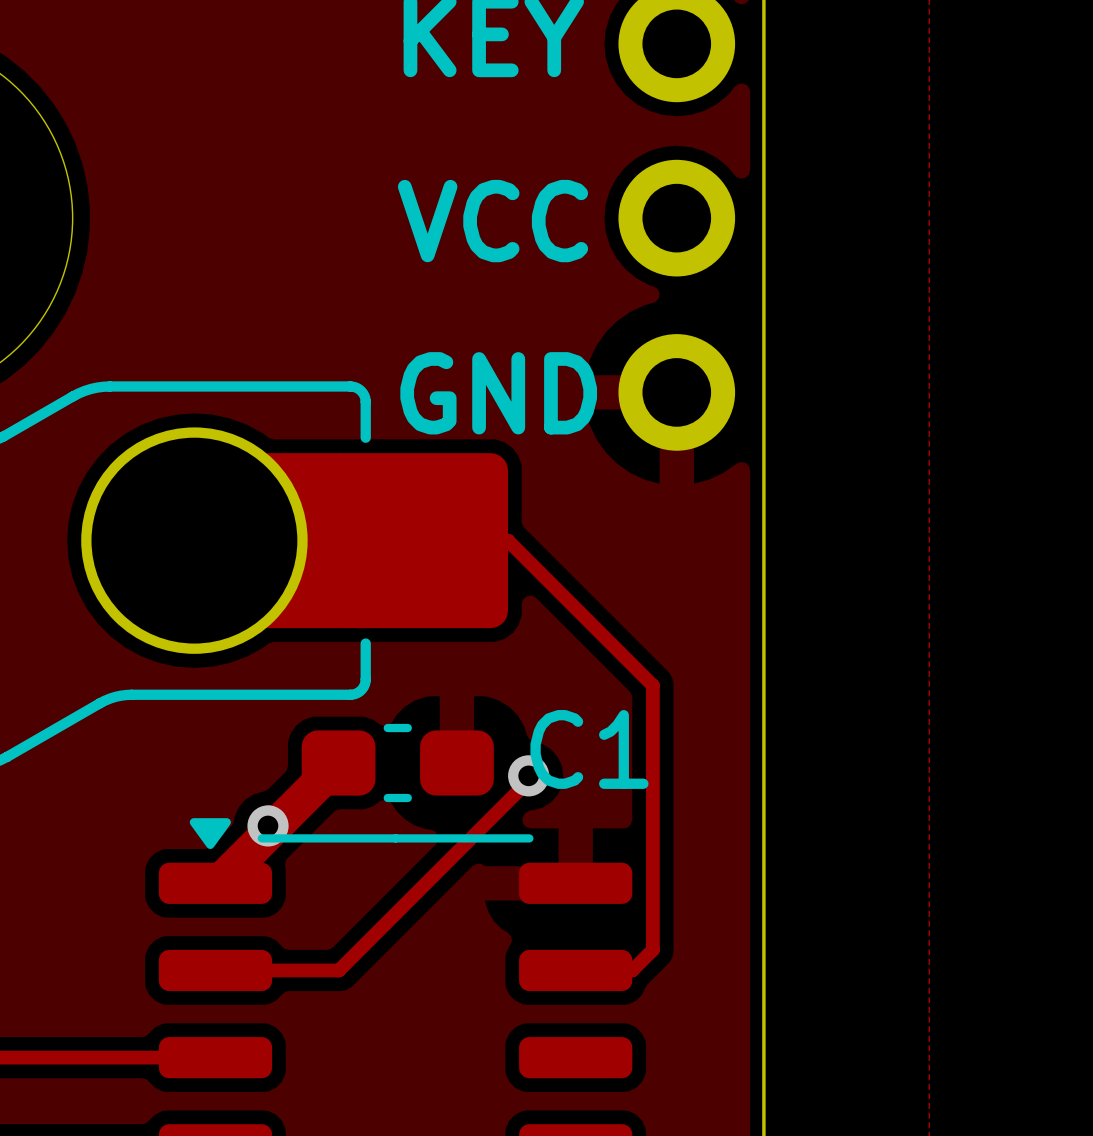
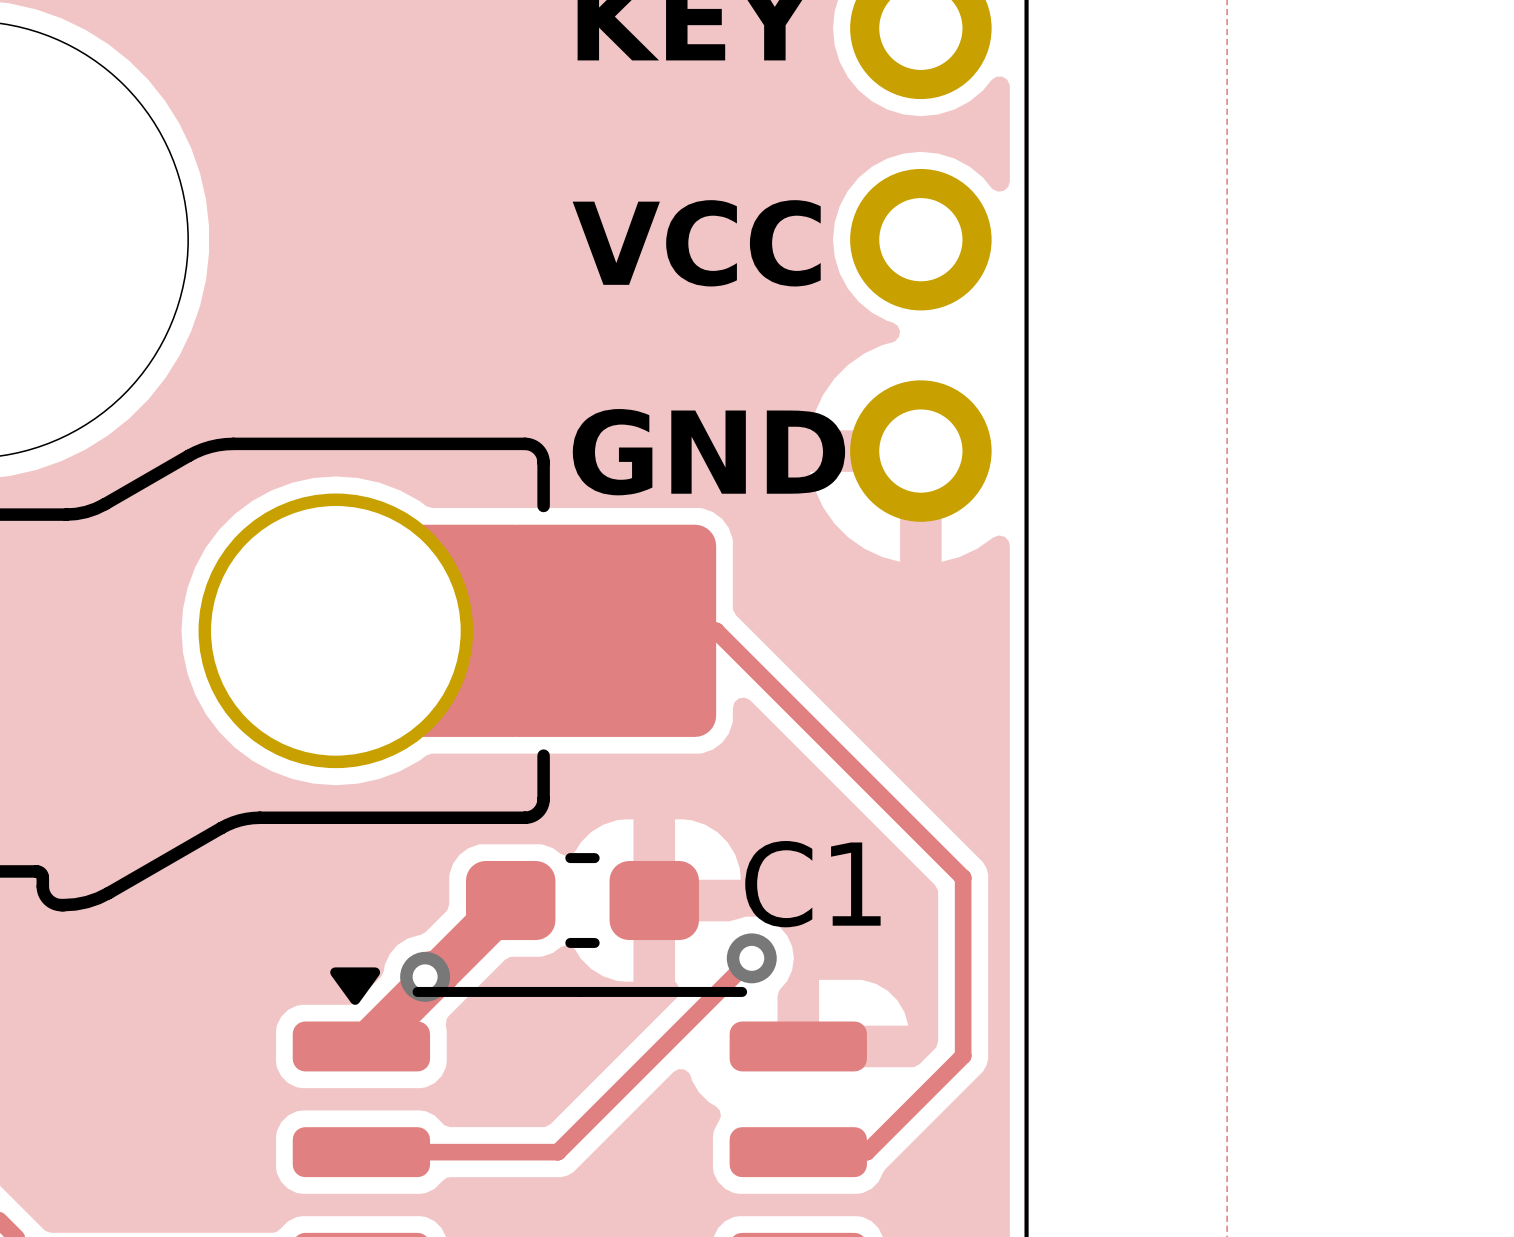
track: (652, 685) (652, 949) -> (891, 806) (963, 877) (963, 1055) (891, 1127)
track: (528, 775) (528, 780) (338, 970) -> (751, 958) (557, 1152) (511, 1152)
via position: (528, 775) -> (751, 958)

